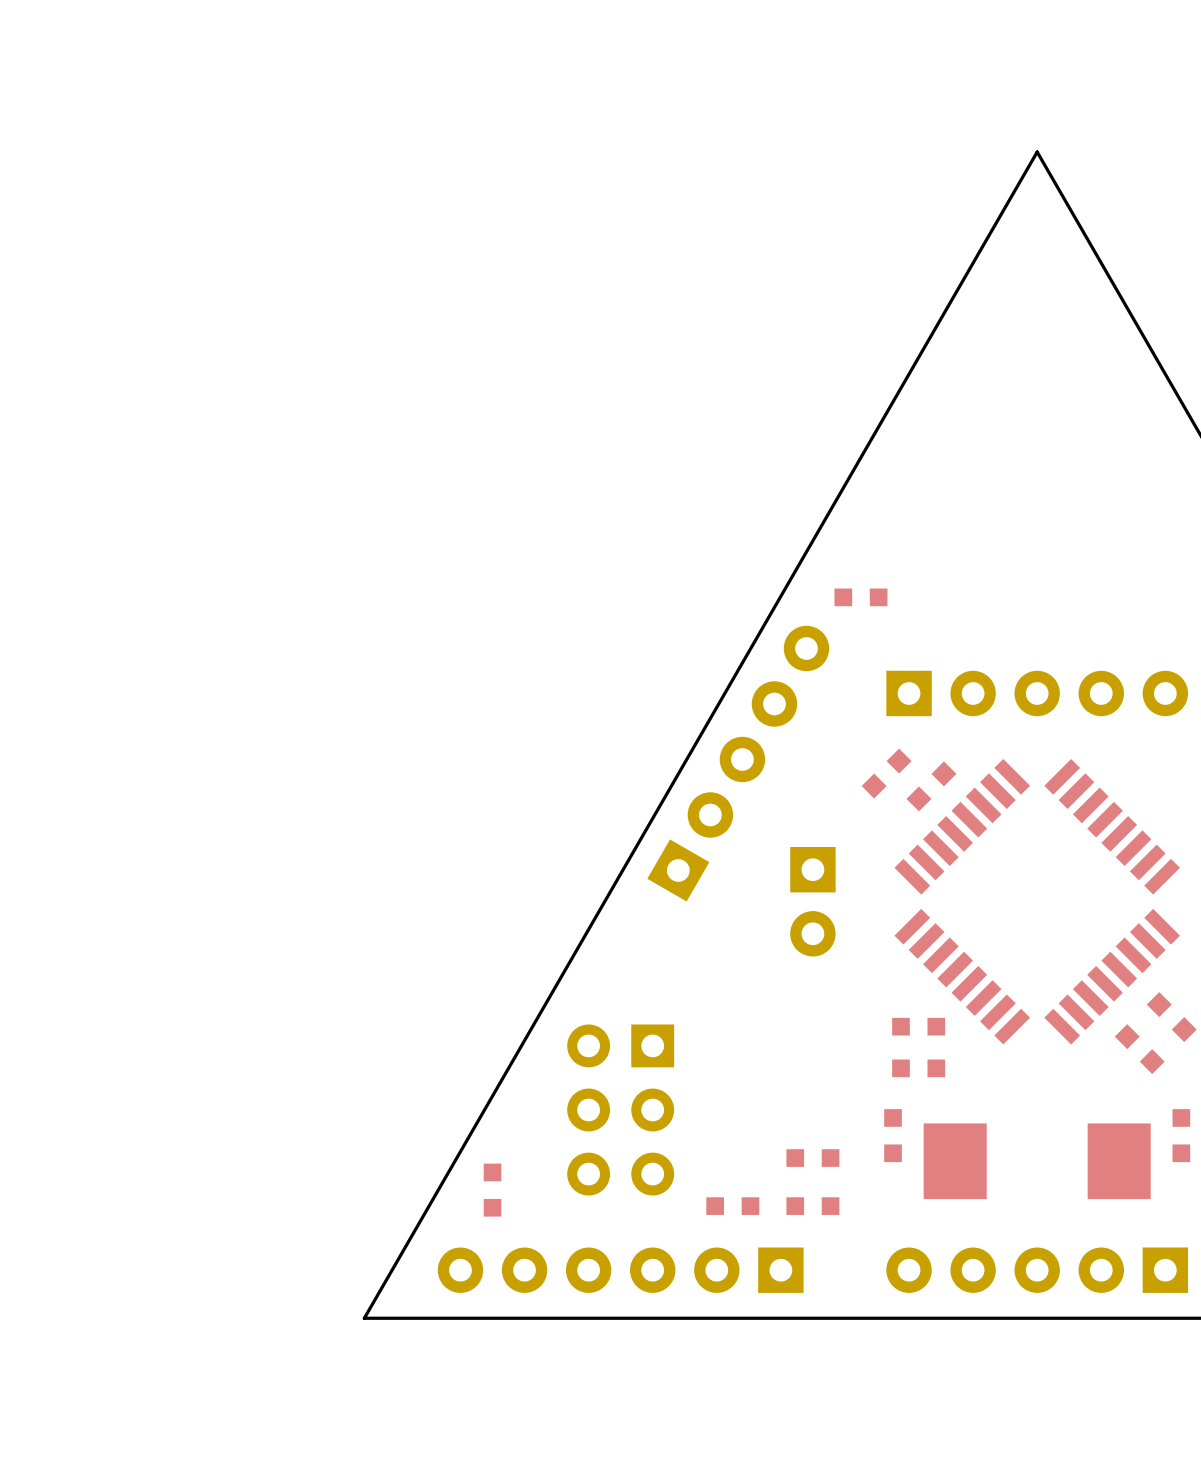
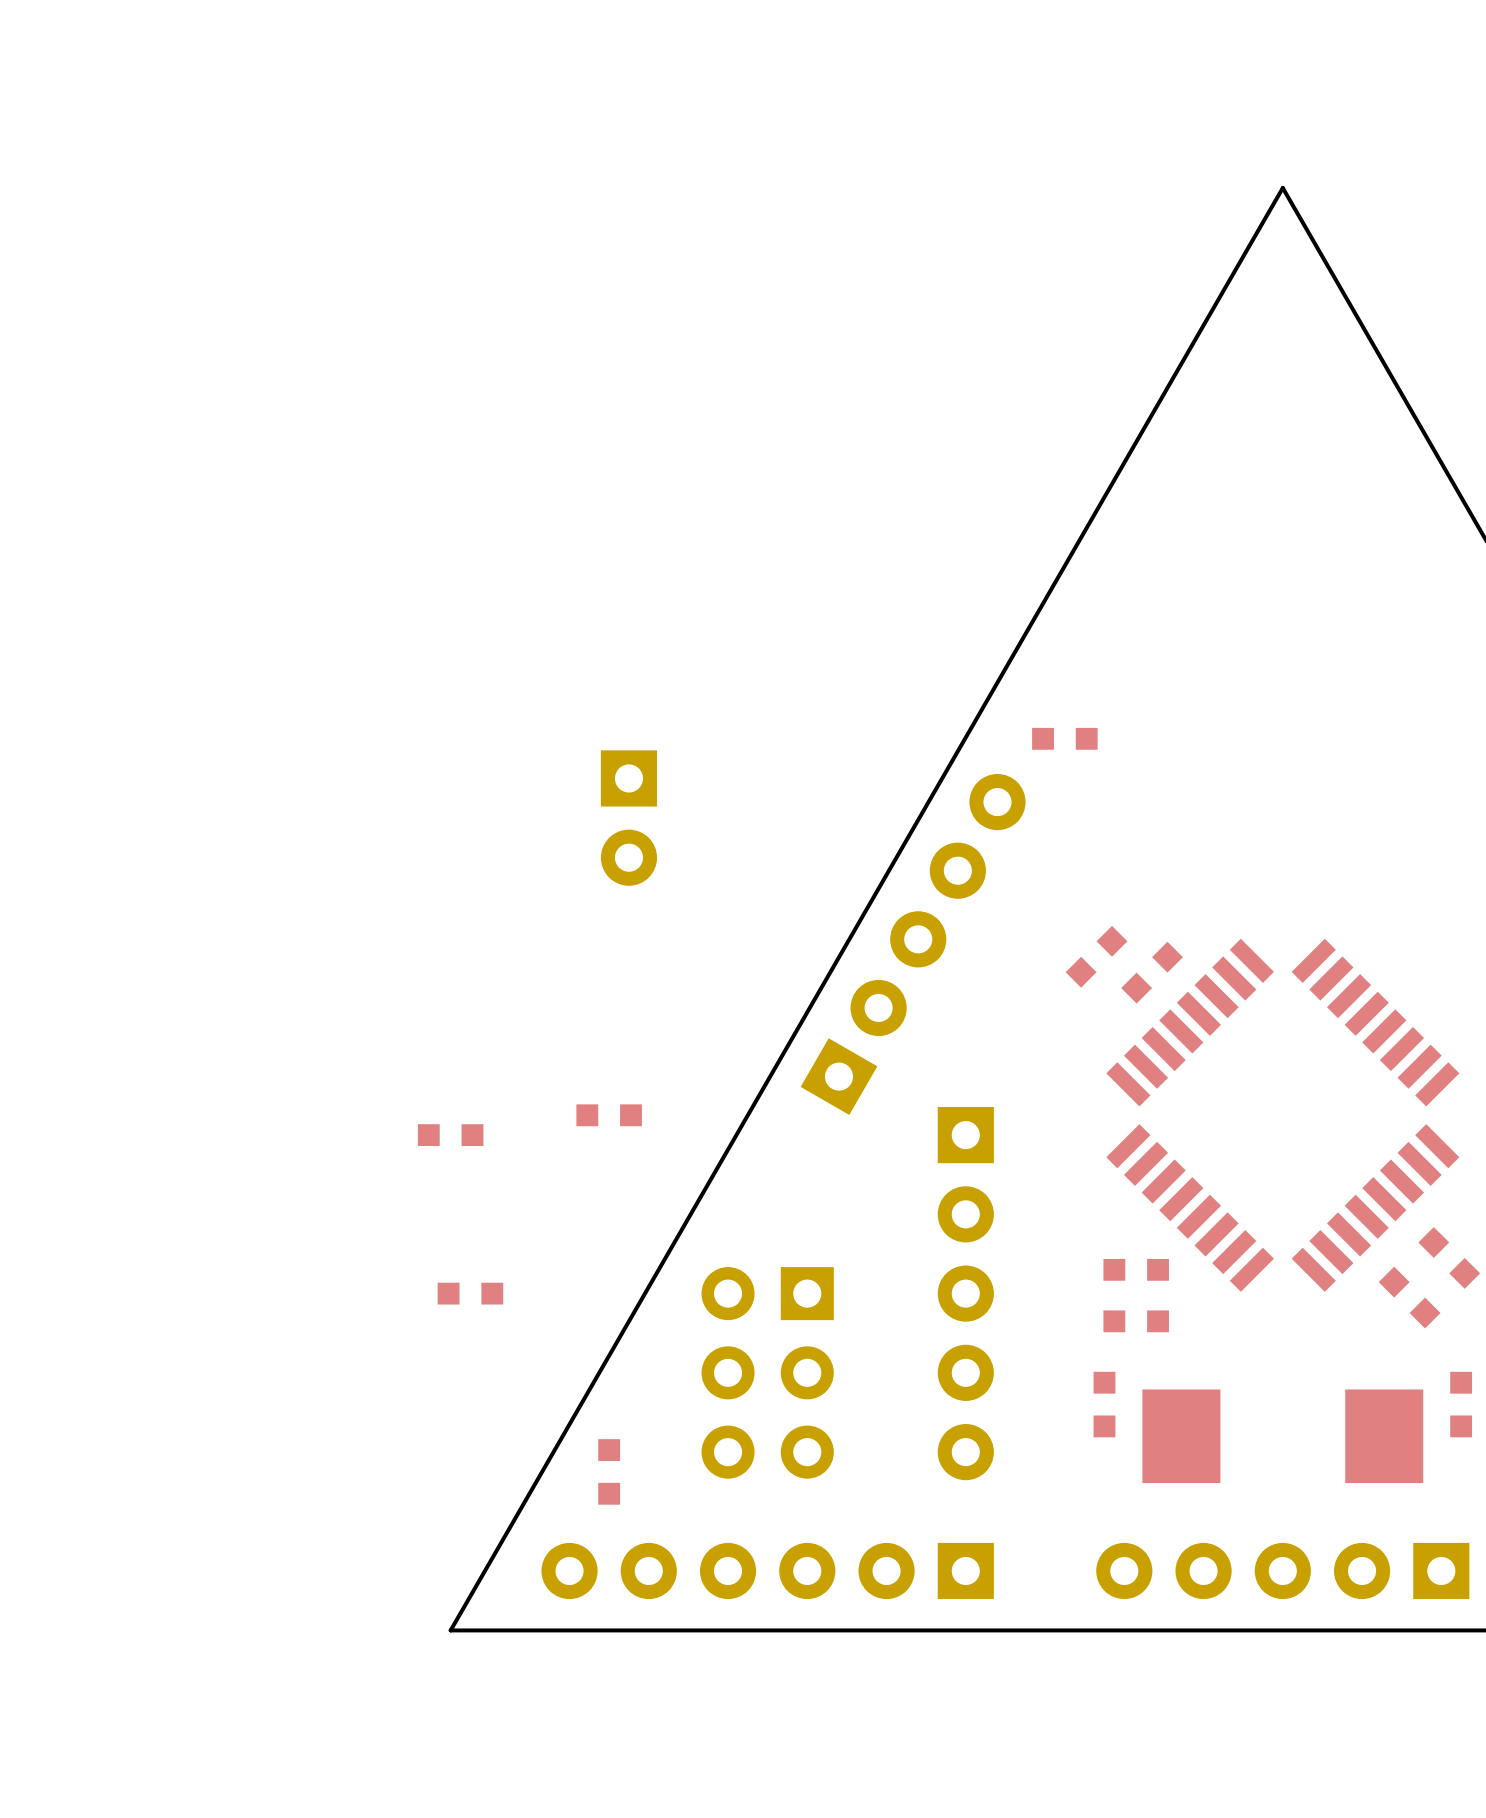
part rotation: 0° (1037, 693) -> 90° clockwise (965, 1293)
part position: (1037, 693) -> (965, 1293)
part: none -> (609, 1115)
part position: (812, 901) -> (628, 818)
part: none -> (450, 1135)
part: none -> (470, 1293)
part: (812, 1158) -> none
part: (732, 1206) -> none
part: (812, 1206) -> none

